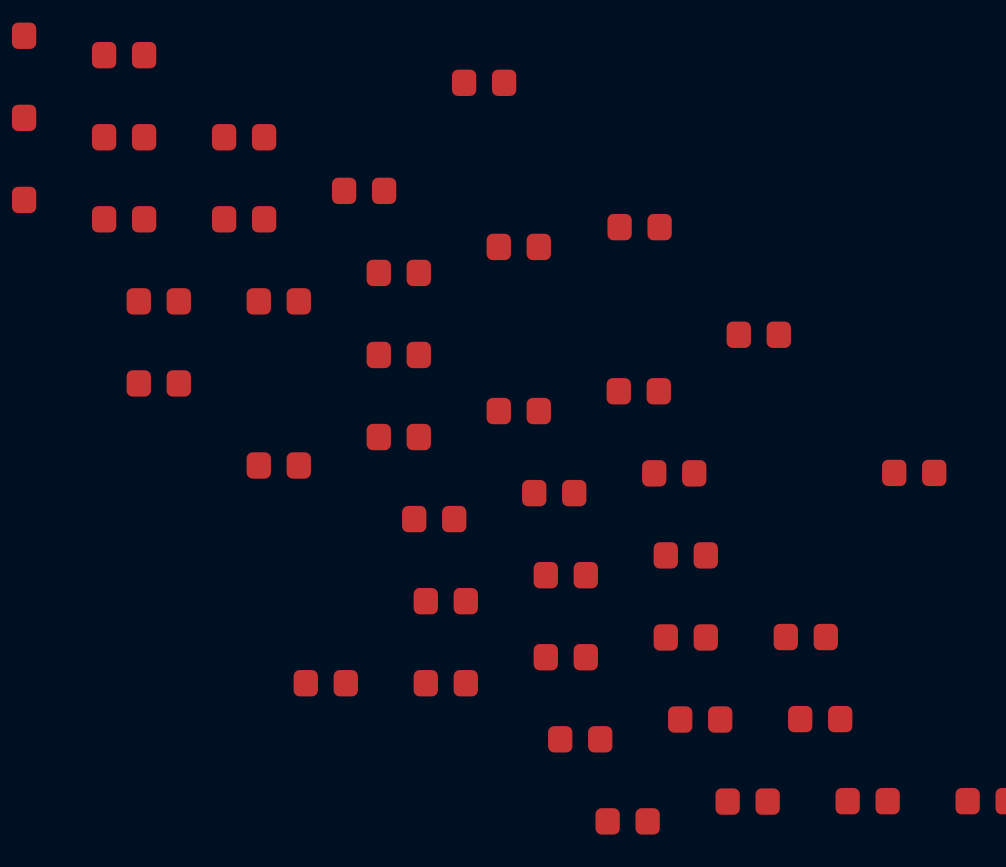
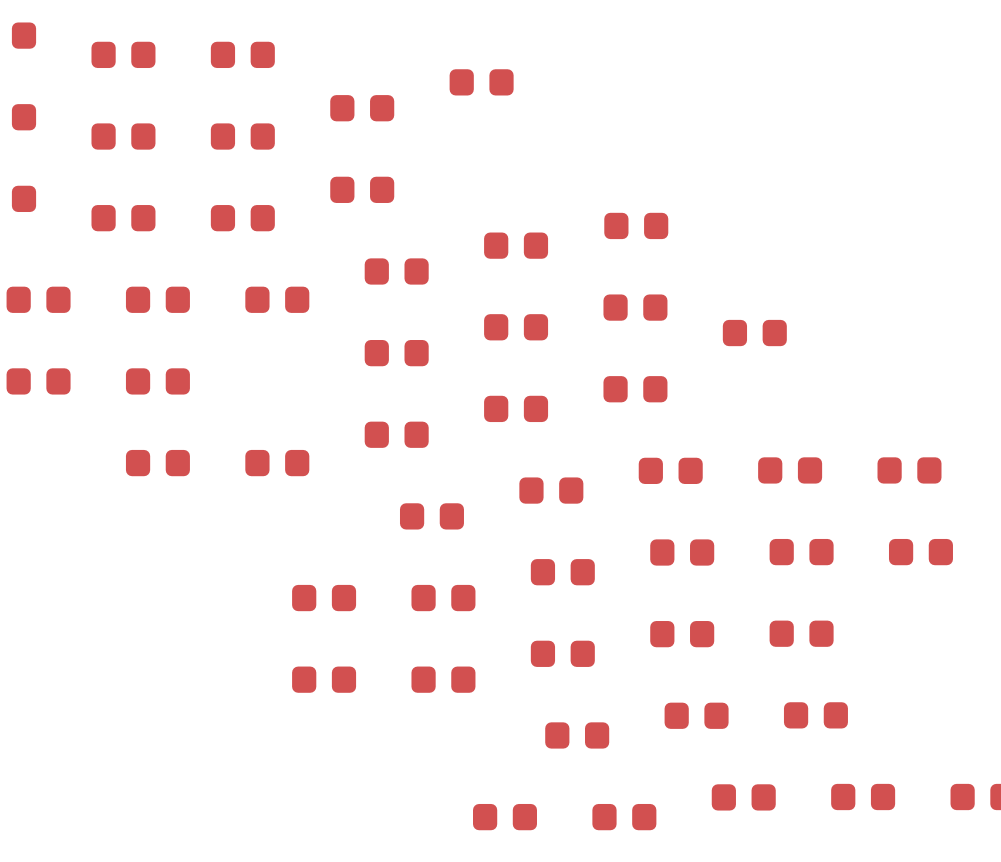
part: none -> (242, 54)
part: none -> (362, 108)
part: none -> (38, 299)
part: none -> (635, 307)
part: none -> (516, 327)
part: none -> (38, 381)
part: none -> (157, 463)
part: none -> (790, 470)
part: none -> (801, 552)
part: none -> (920, 552)
part: none -> (324, 598)
part: none -> (505, 817)

